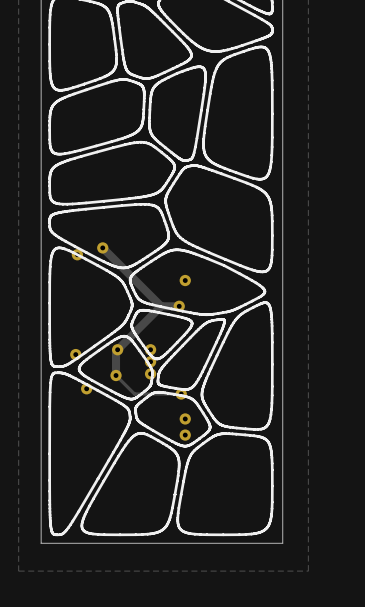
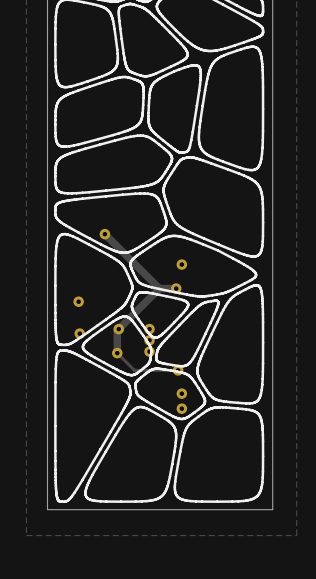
via: (77, 254) -> none
via: none -> (78, 301)
via: (86, 388) -> none

